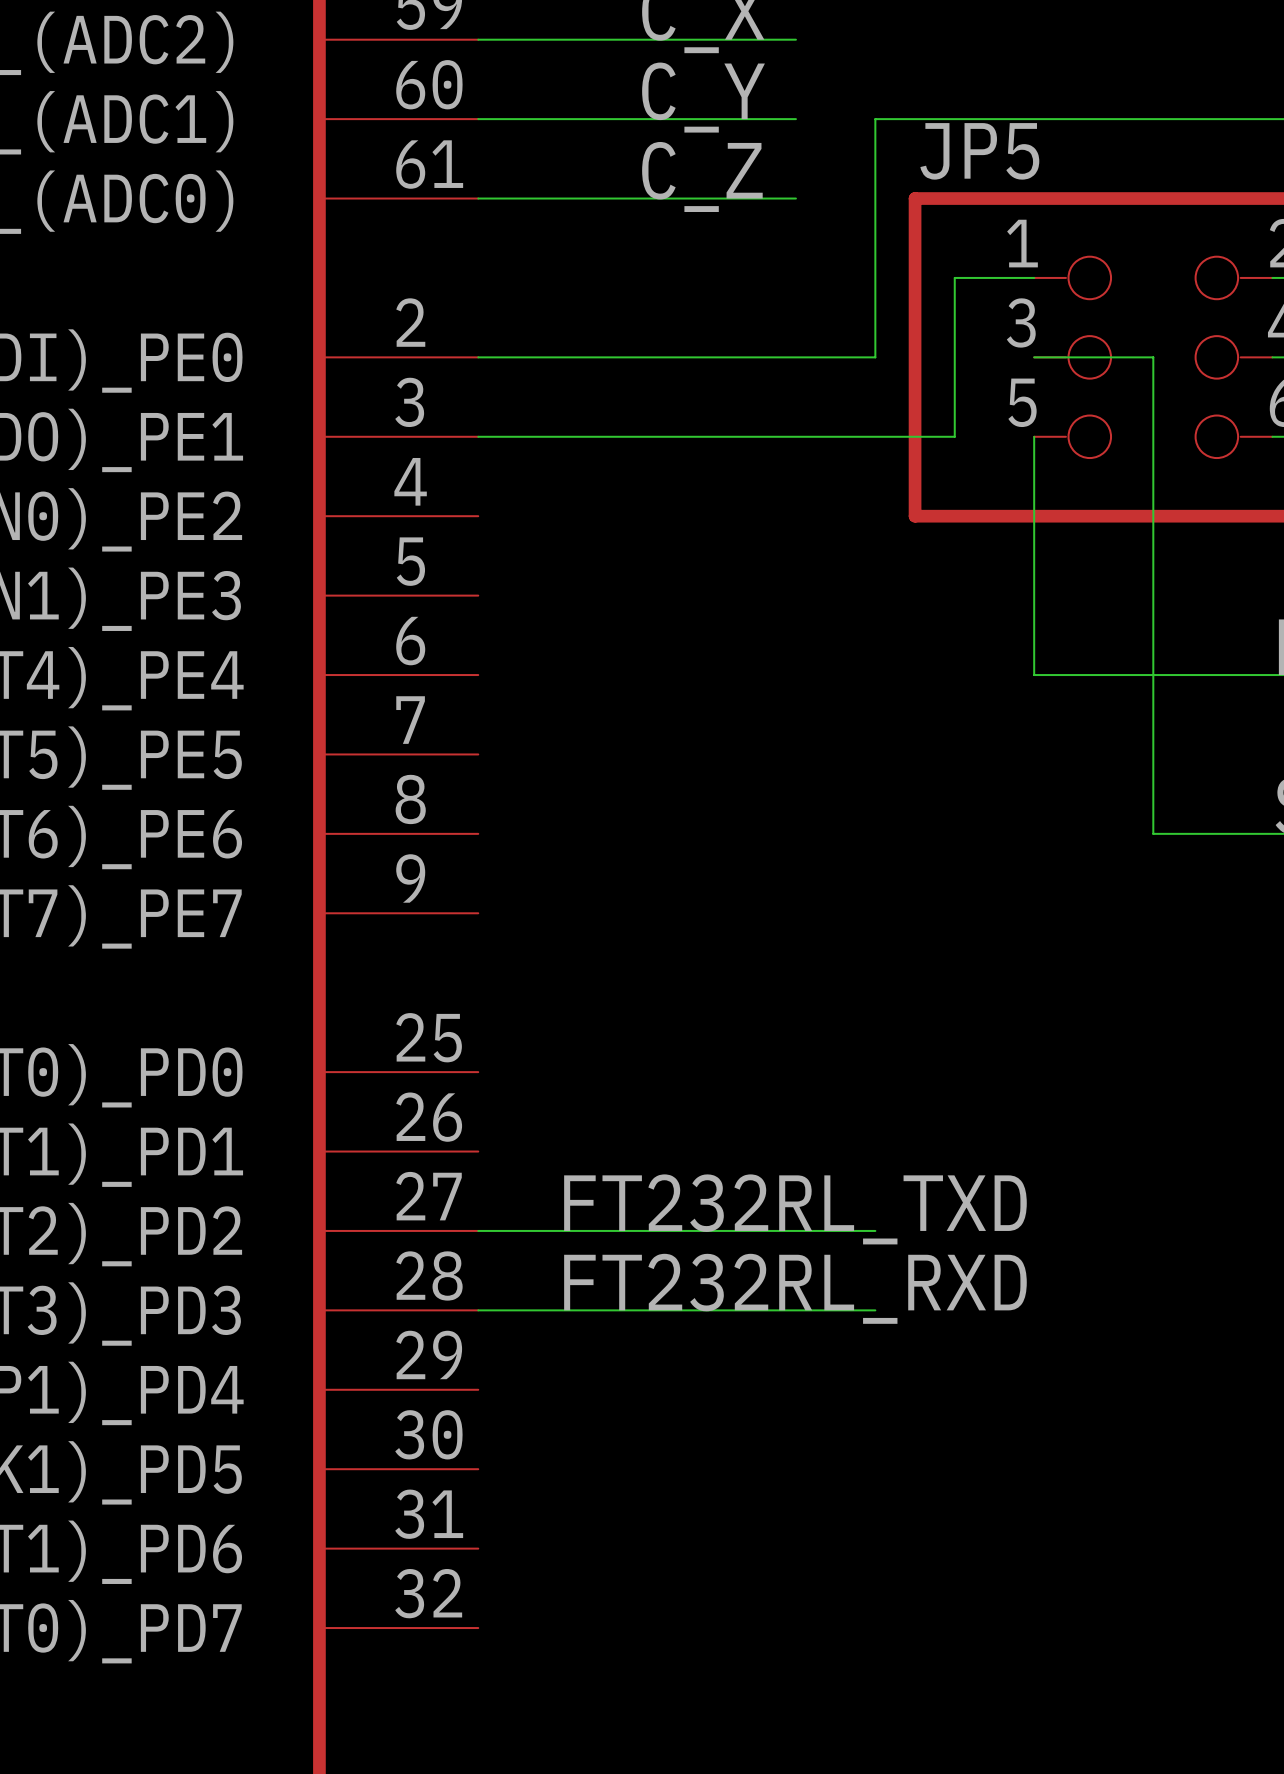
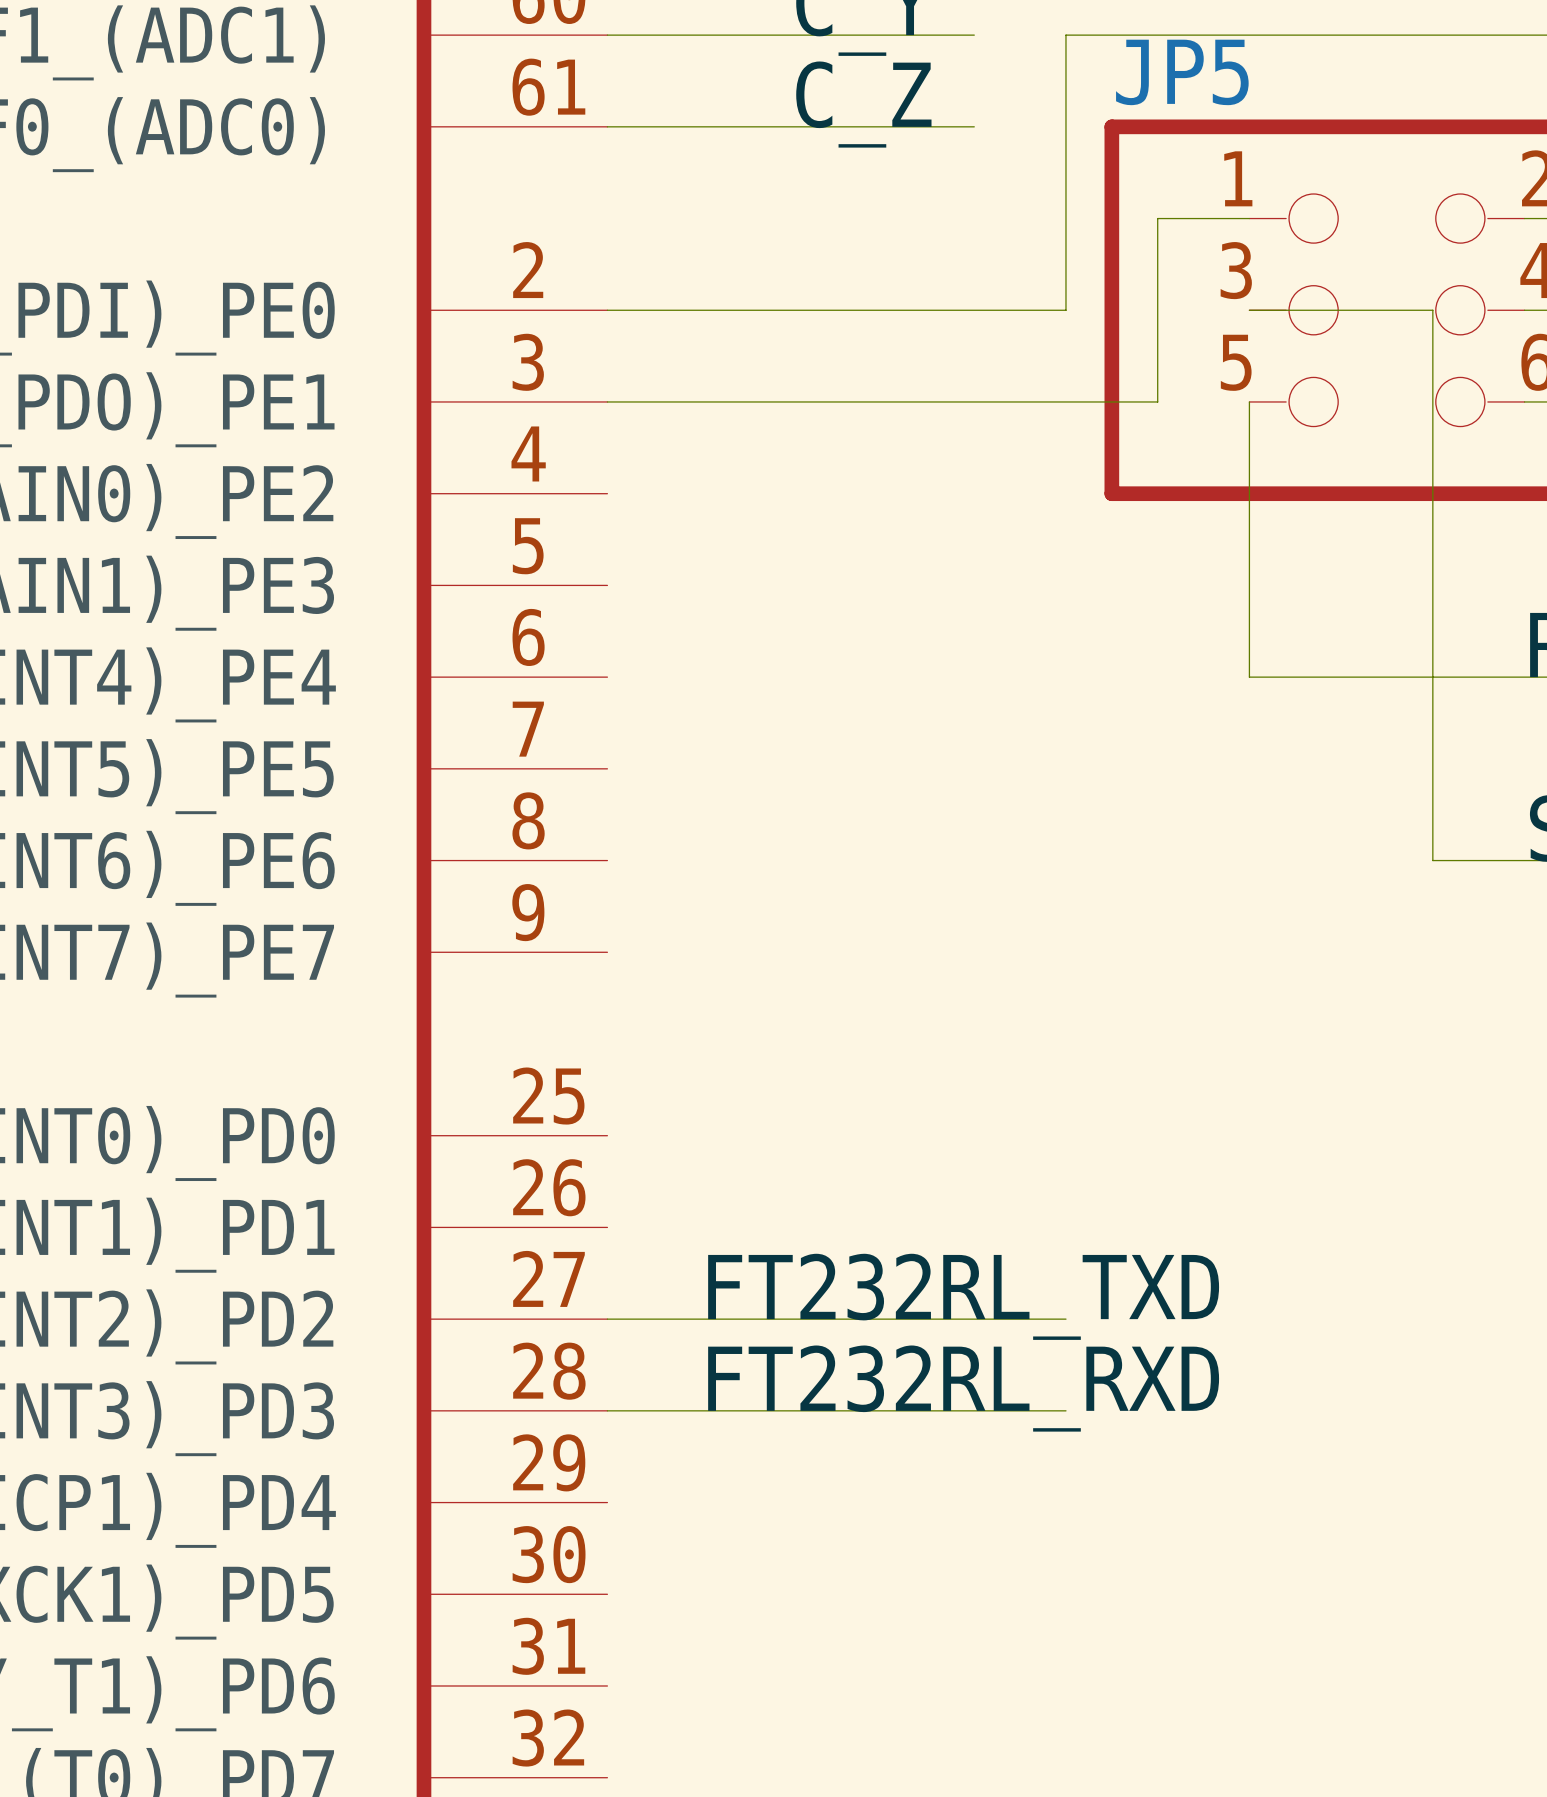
wire: (1153, 357) (1153, 833) (1193, 833) -> (1386, 310) (1432, 310) (1432, 860)

